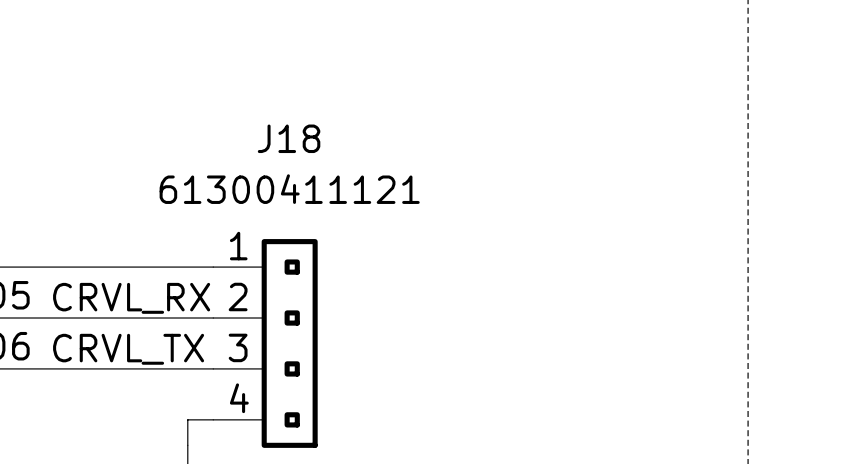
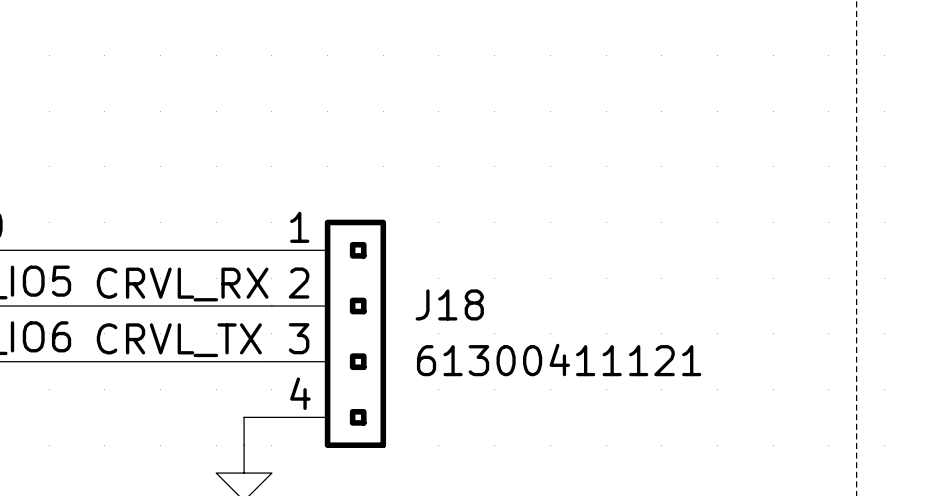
J18 name position: J18 (289, 138) -> J18 (449, 304)
J18 text position: 61300411121 (289, 189) -> 61300411121 (559, 359)

